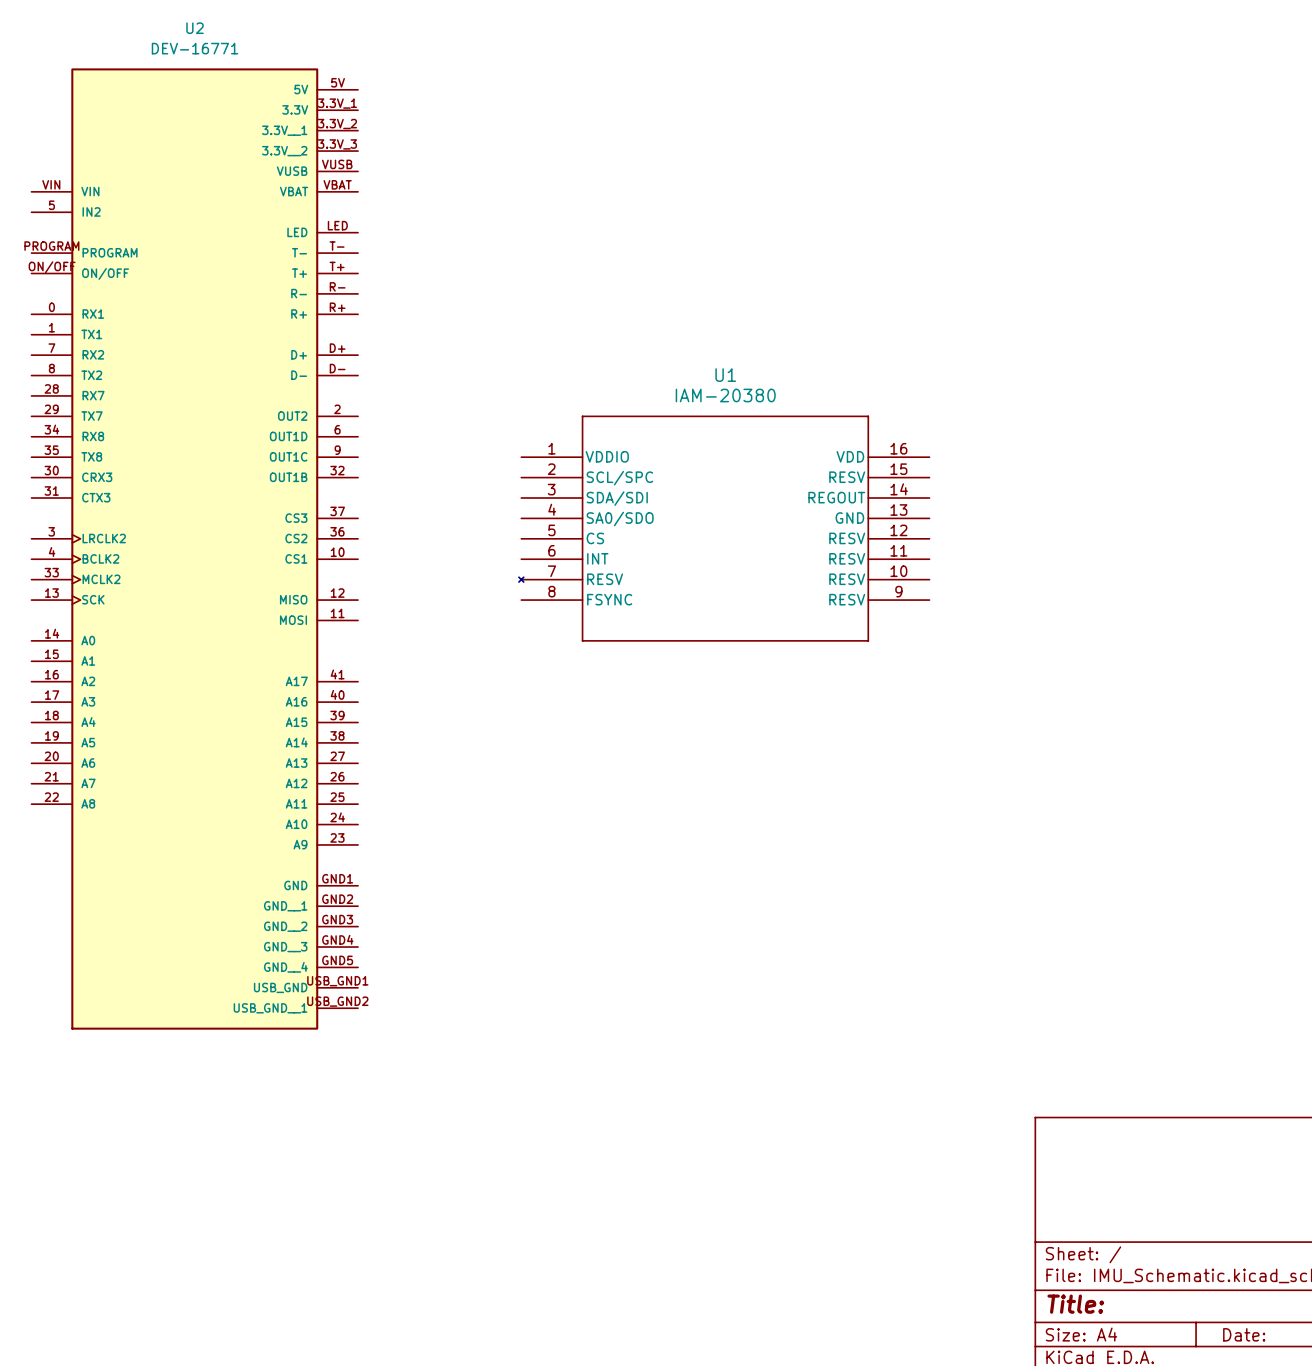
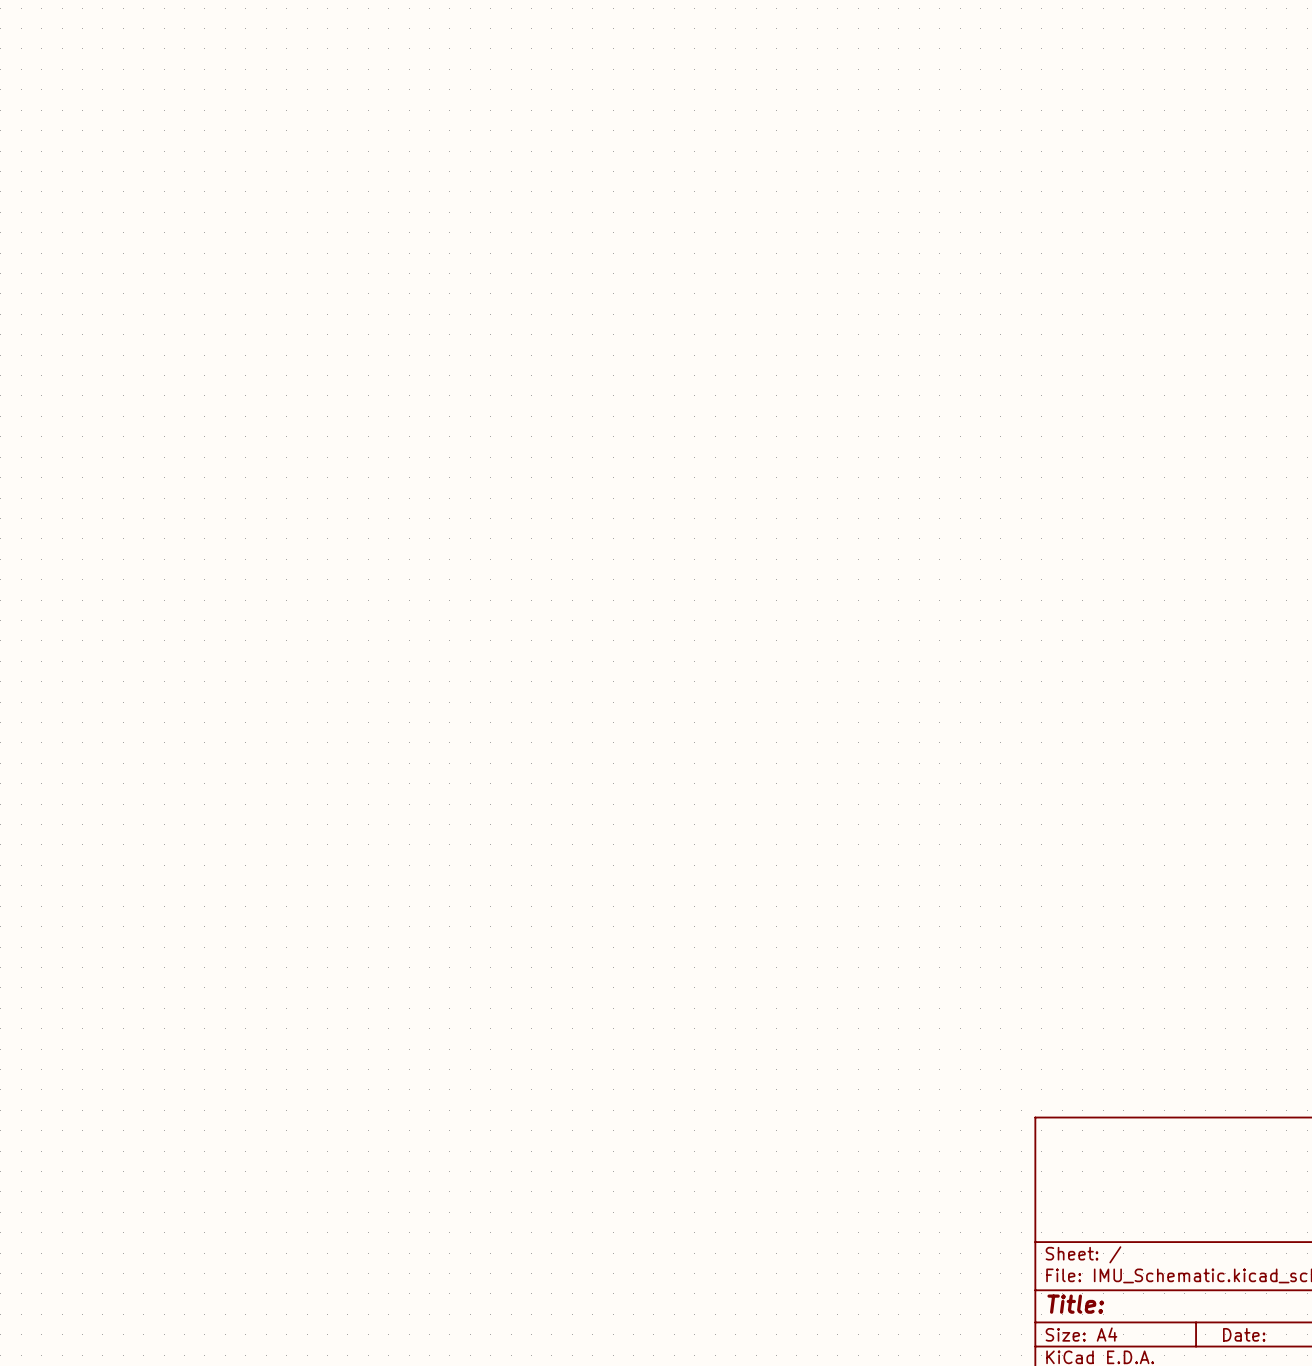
U1: IAM-20380 (724, 528) -> none
U2: DEV-16771 (194, 549) -> none

